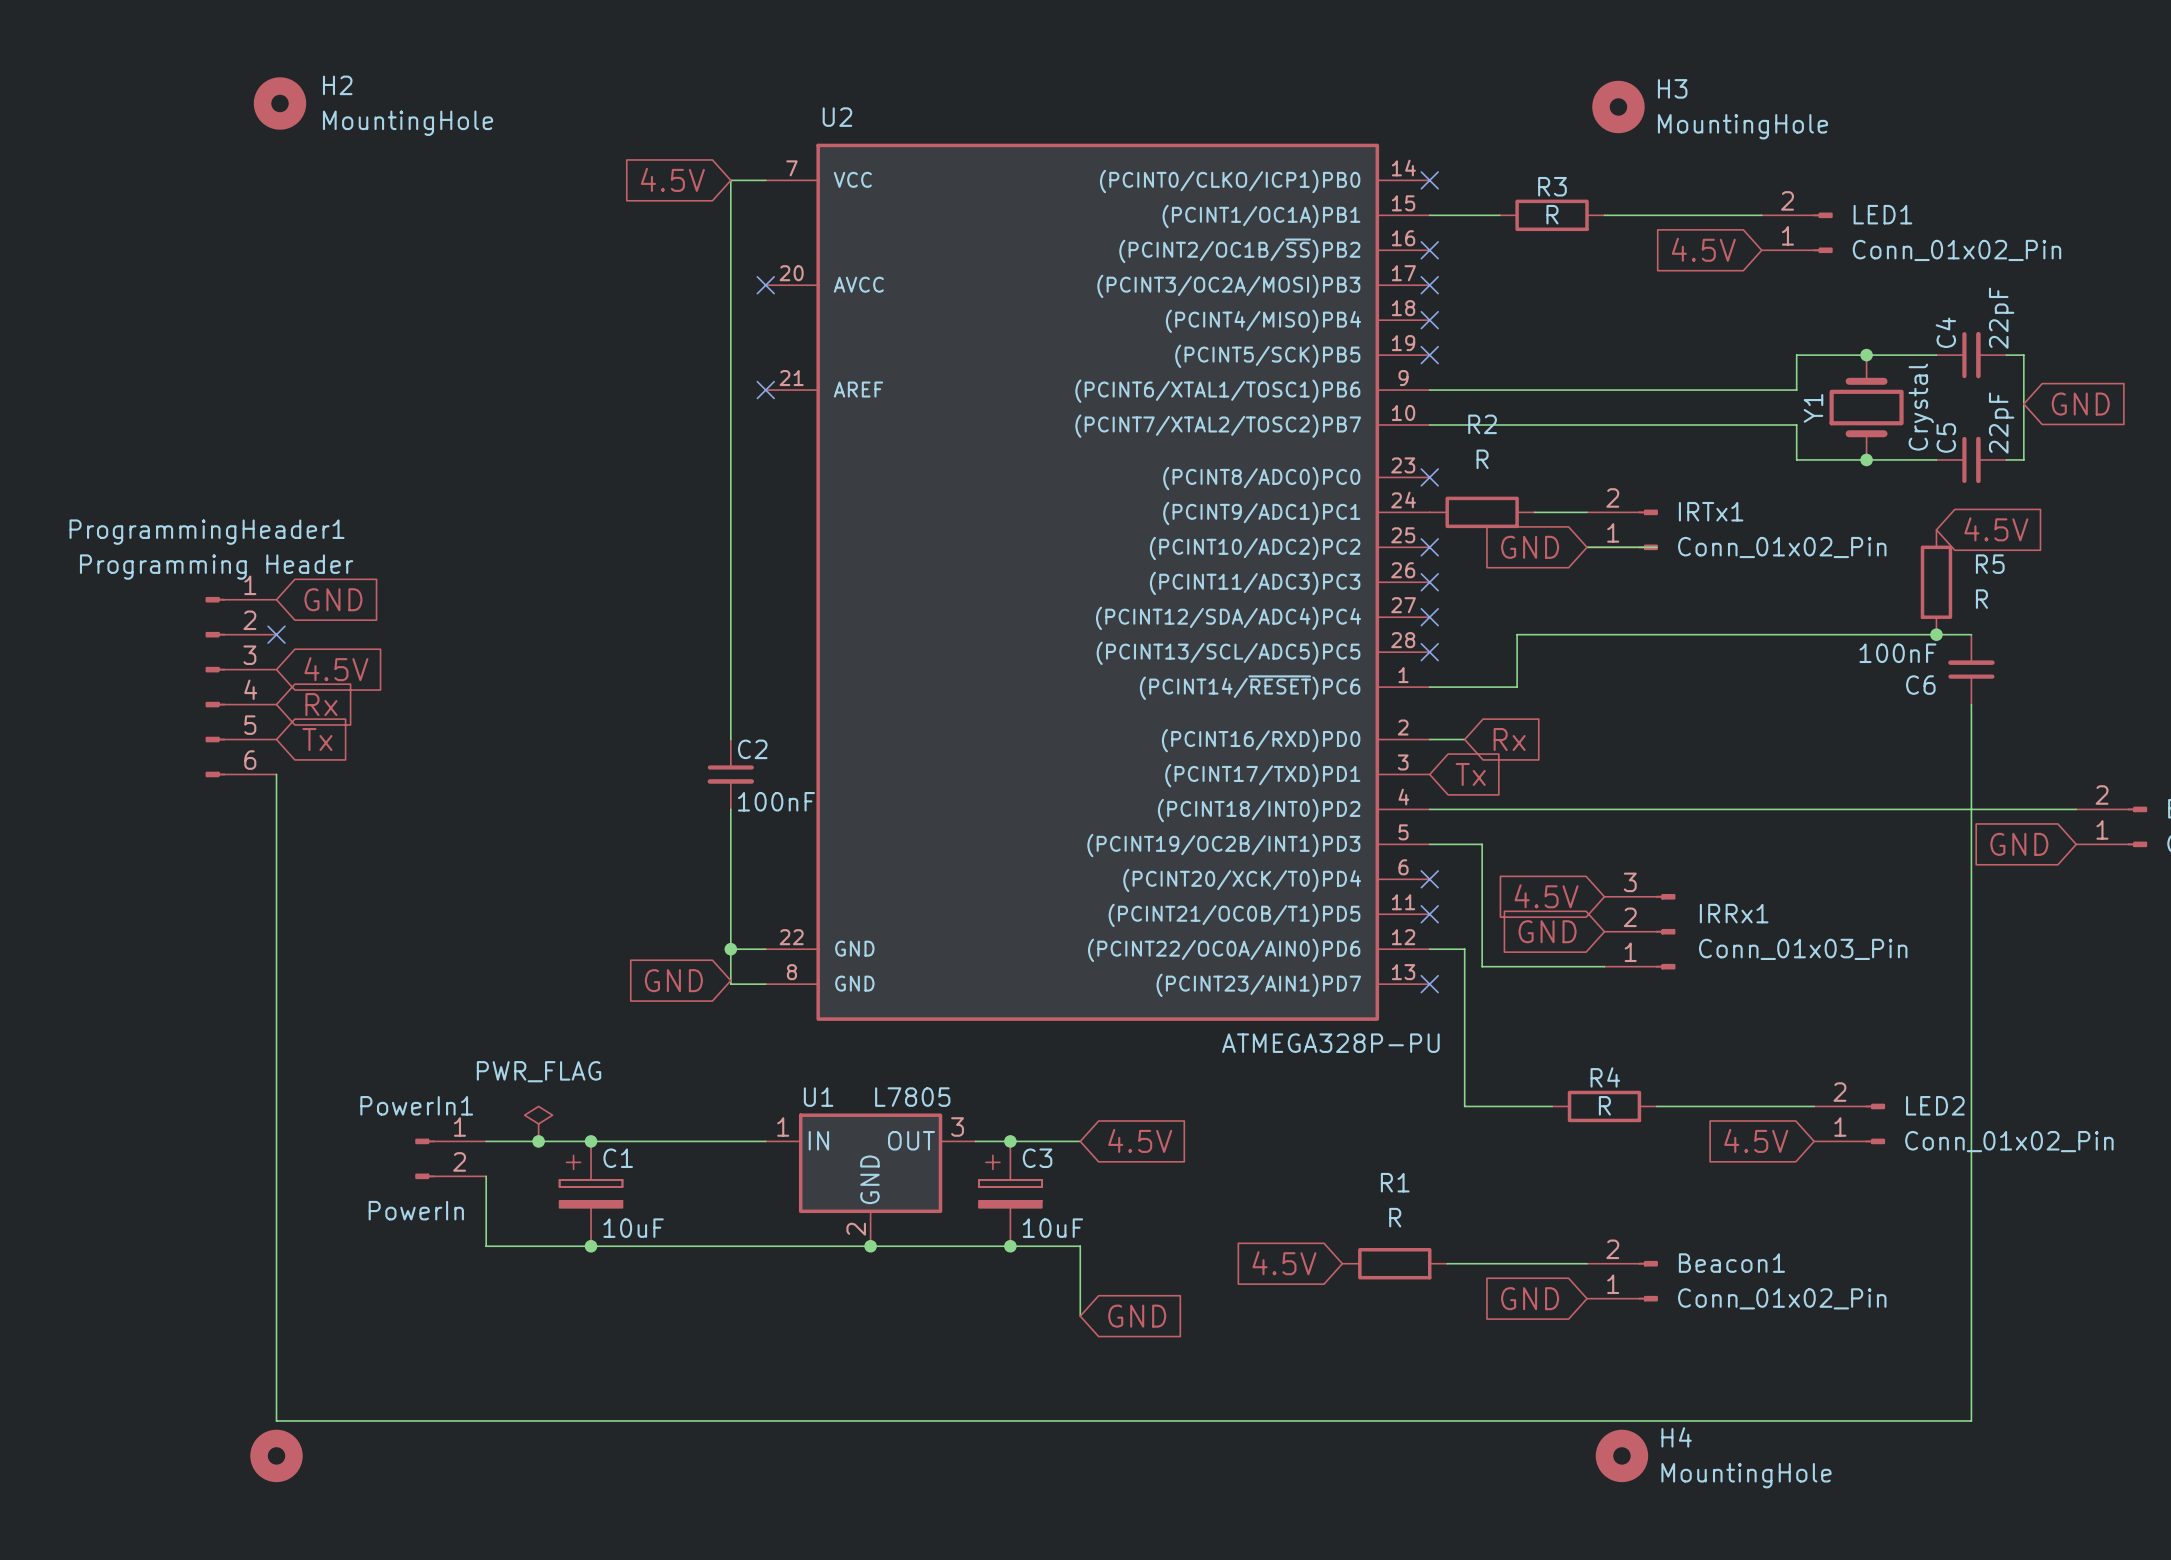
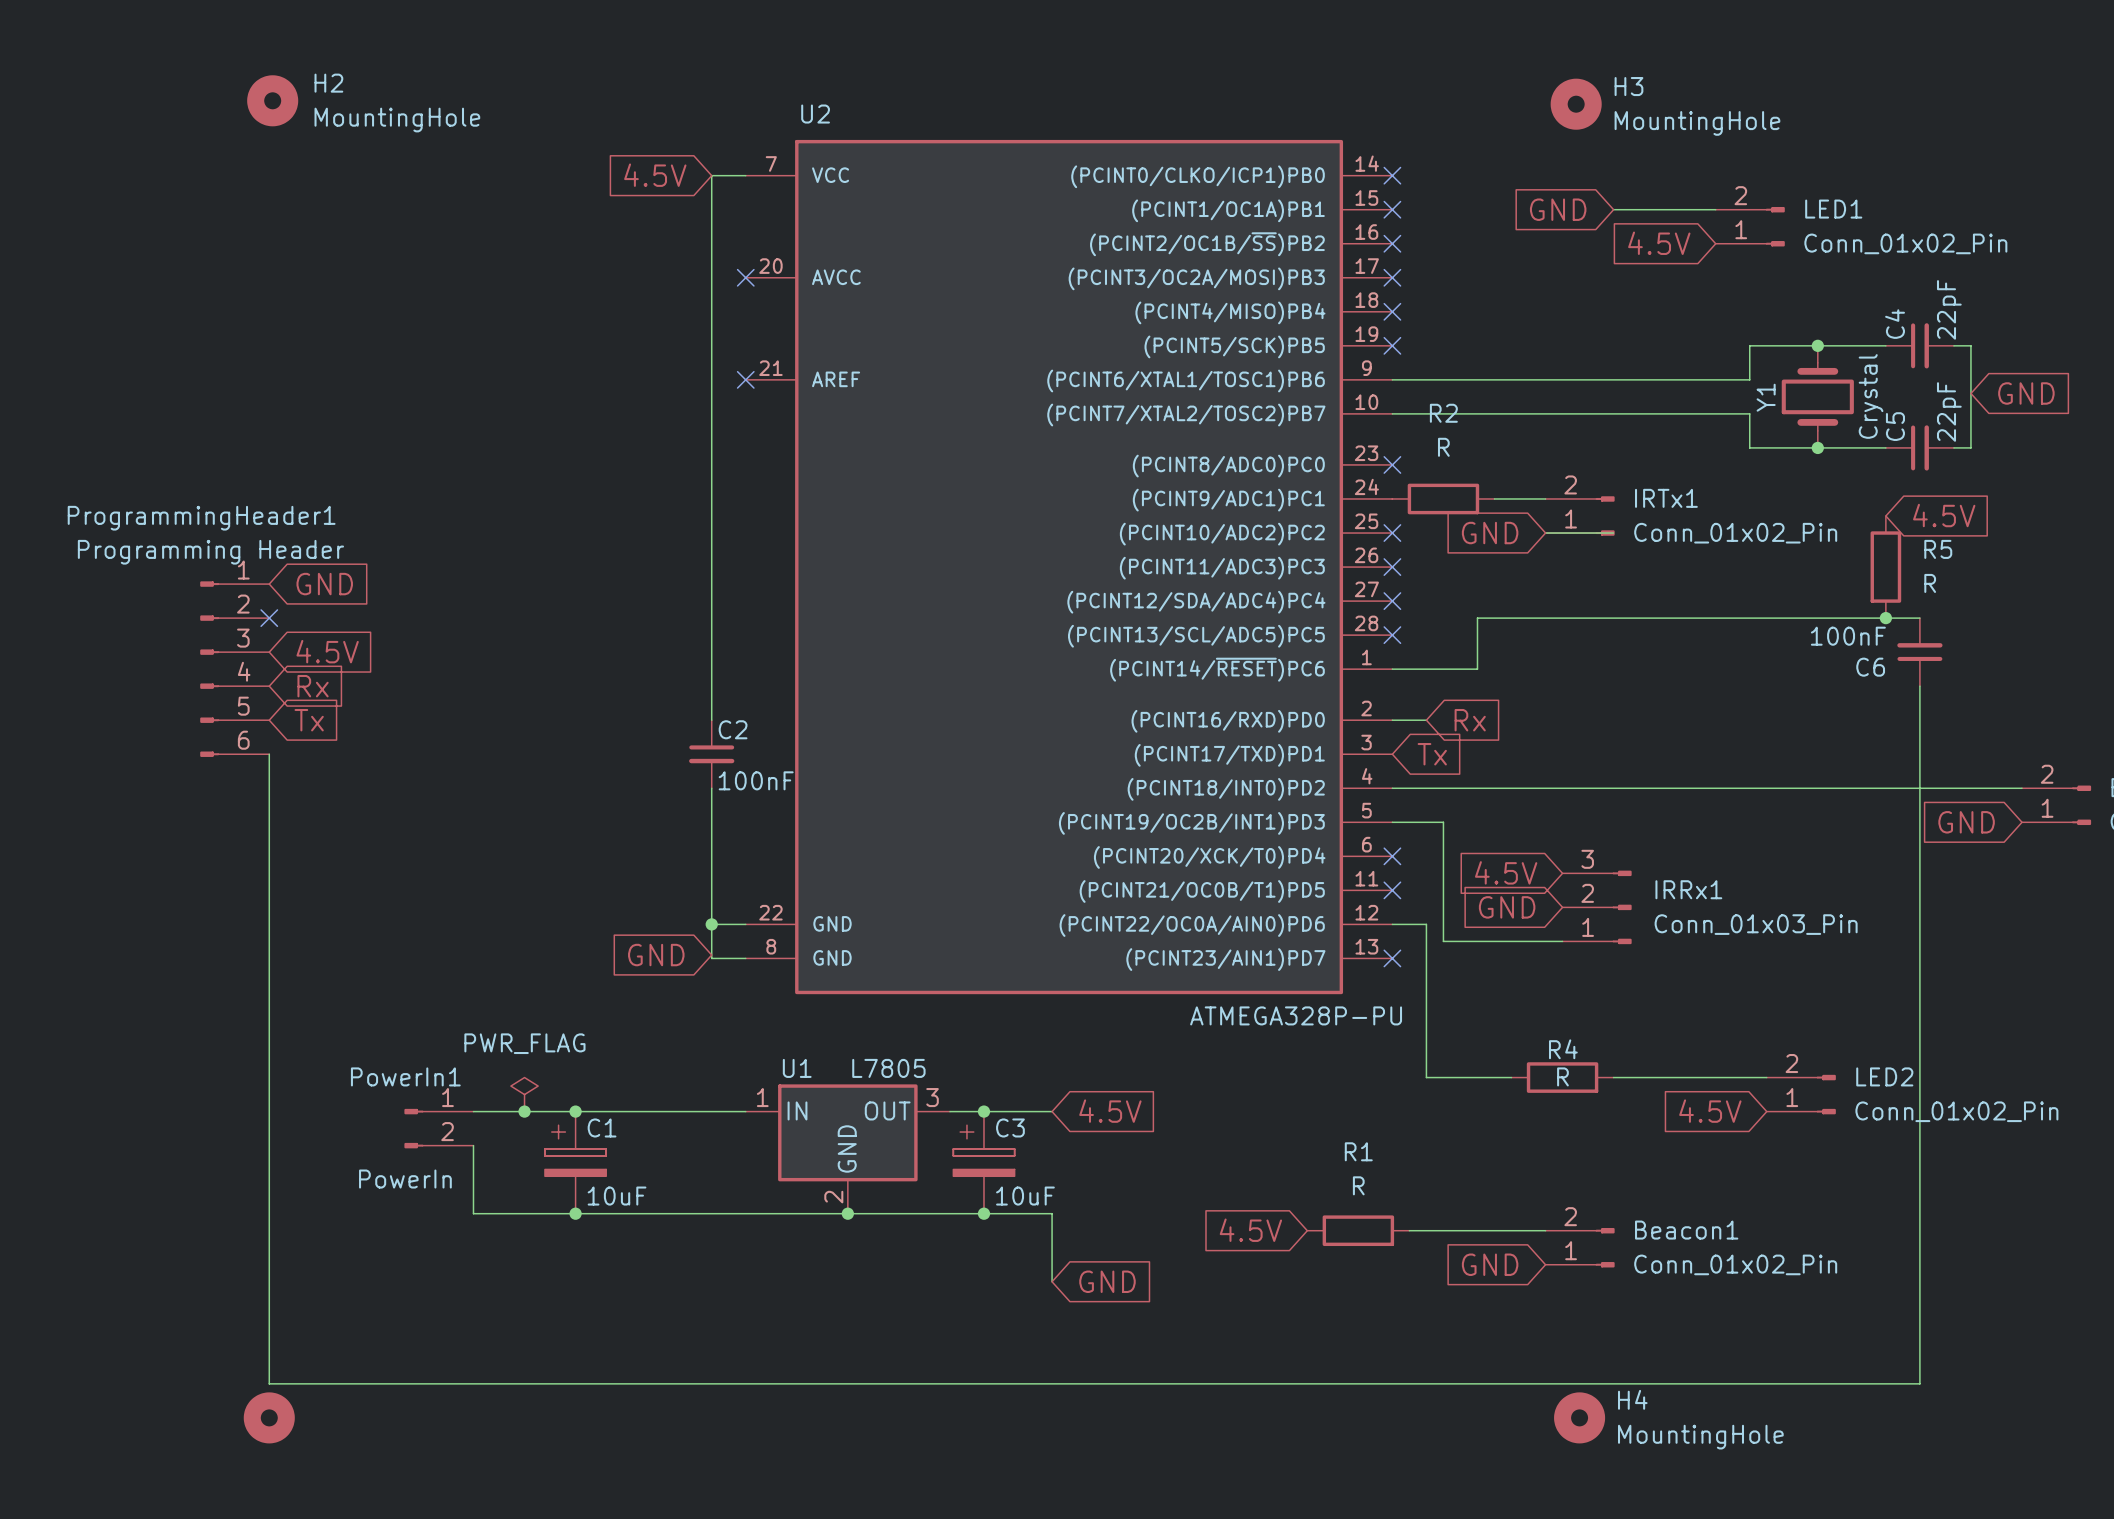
wire: (1429, 215) (1499, 215) -> none
no-connect mark: none -> (1392, 209)
R3: R (1552, 215) -> none
global label: none -> GND (1558, 209)
wire: (1604, 215) (1656, 215) -> none

